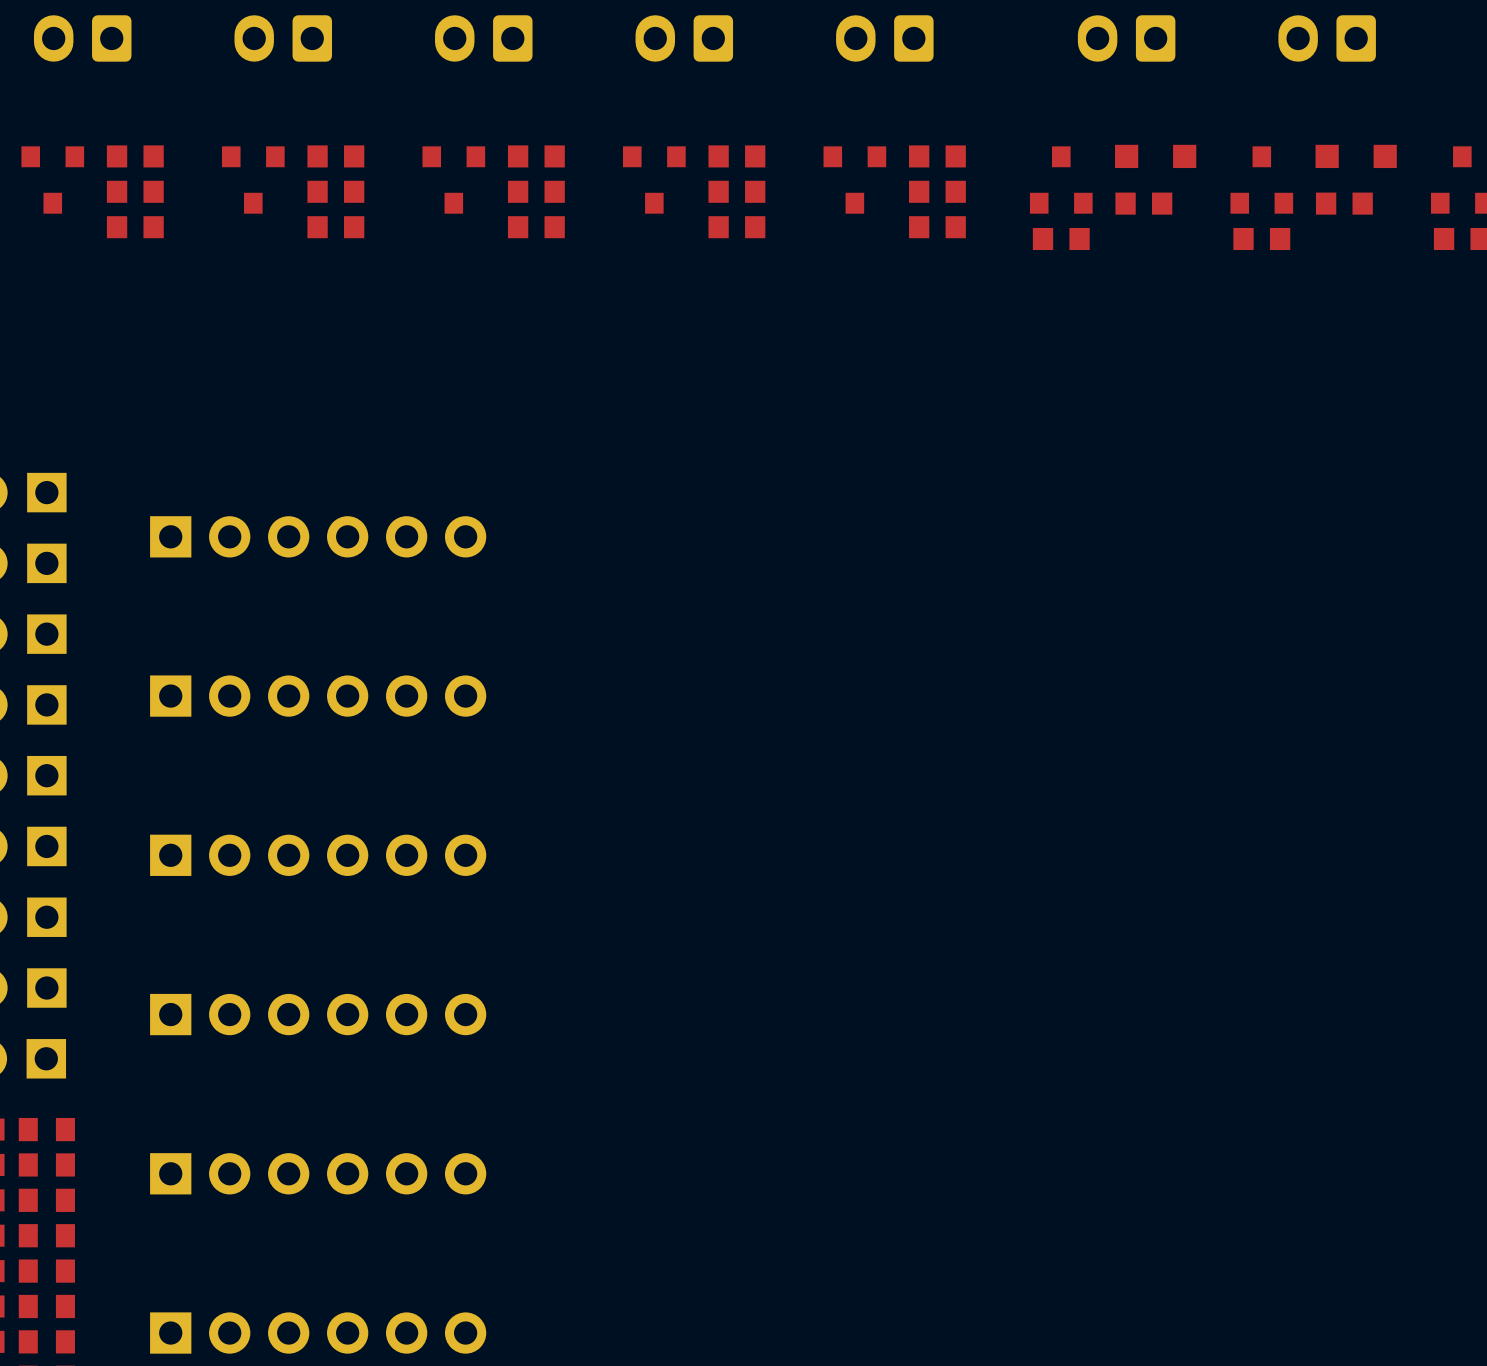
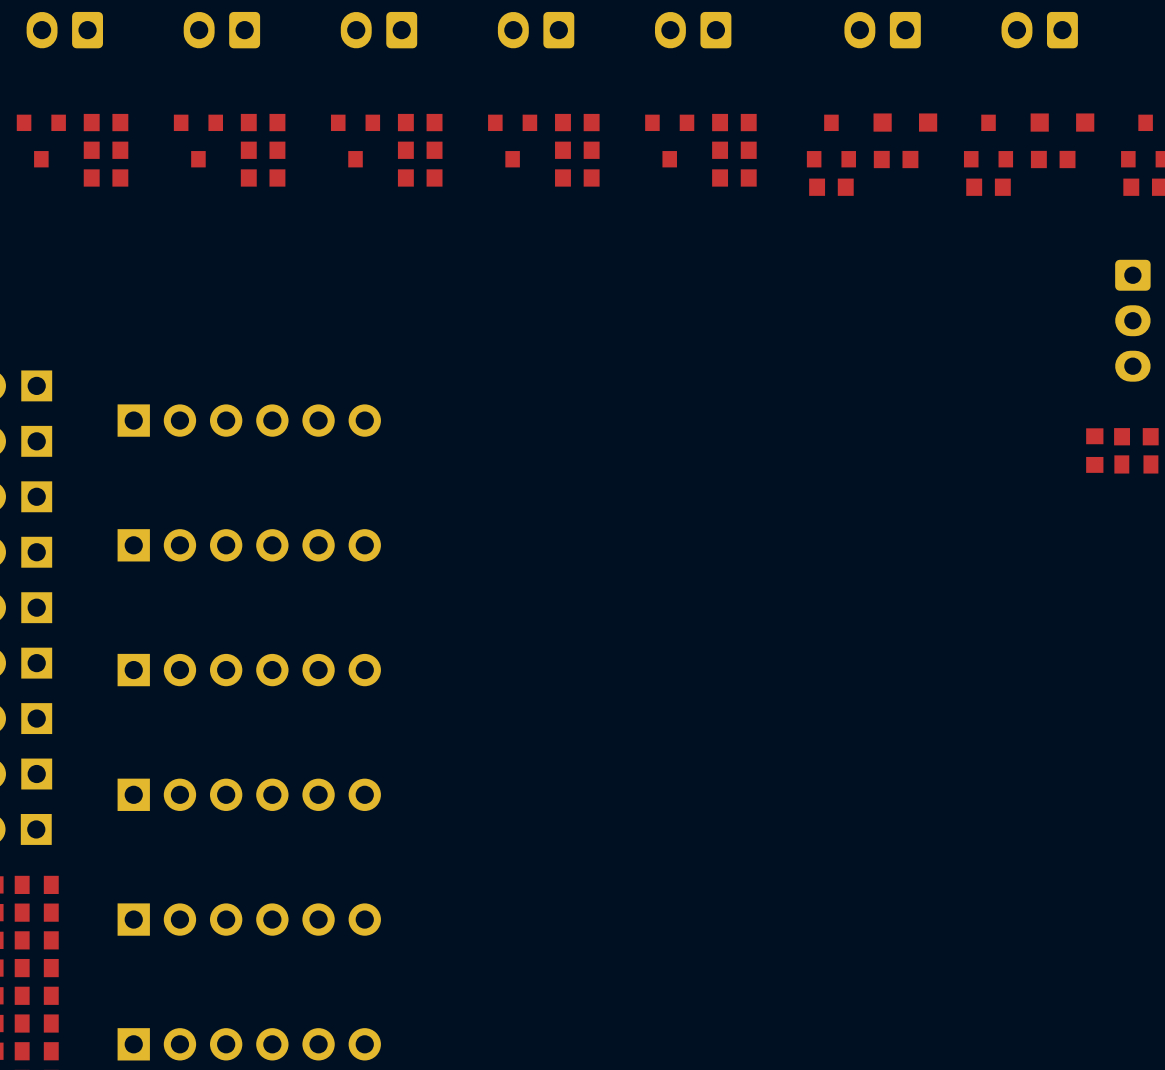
part: none -> (1132, 320)
part: none -> (1136, 436)
part: none -> (1094, 450)
part: none -> (1136, 464)

